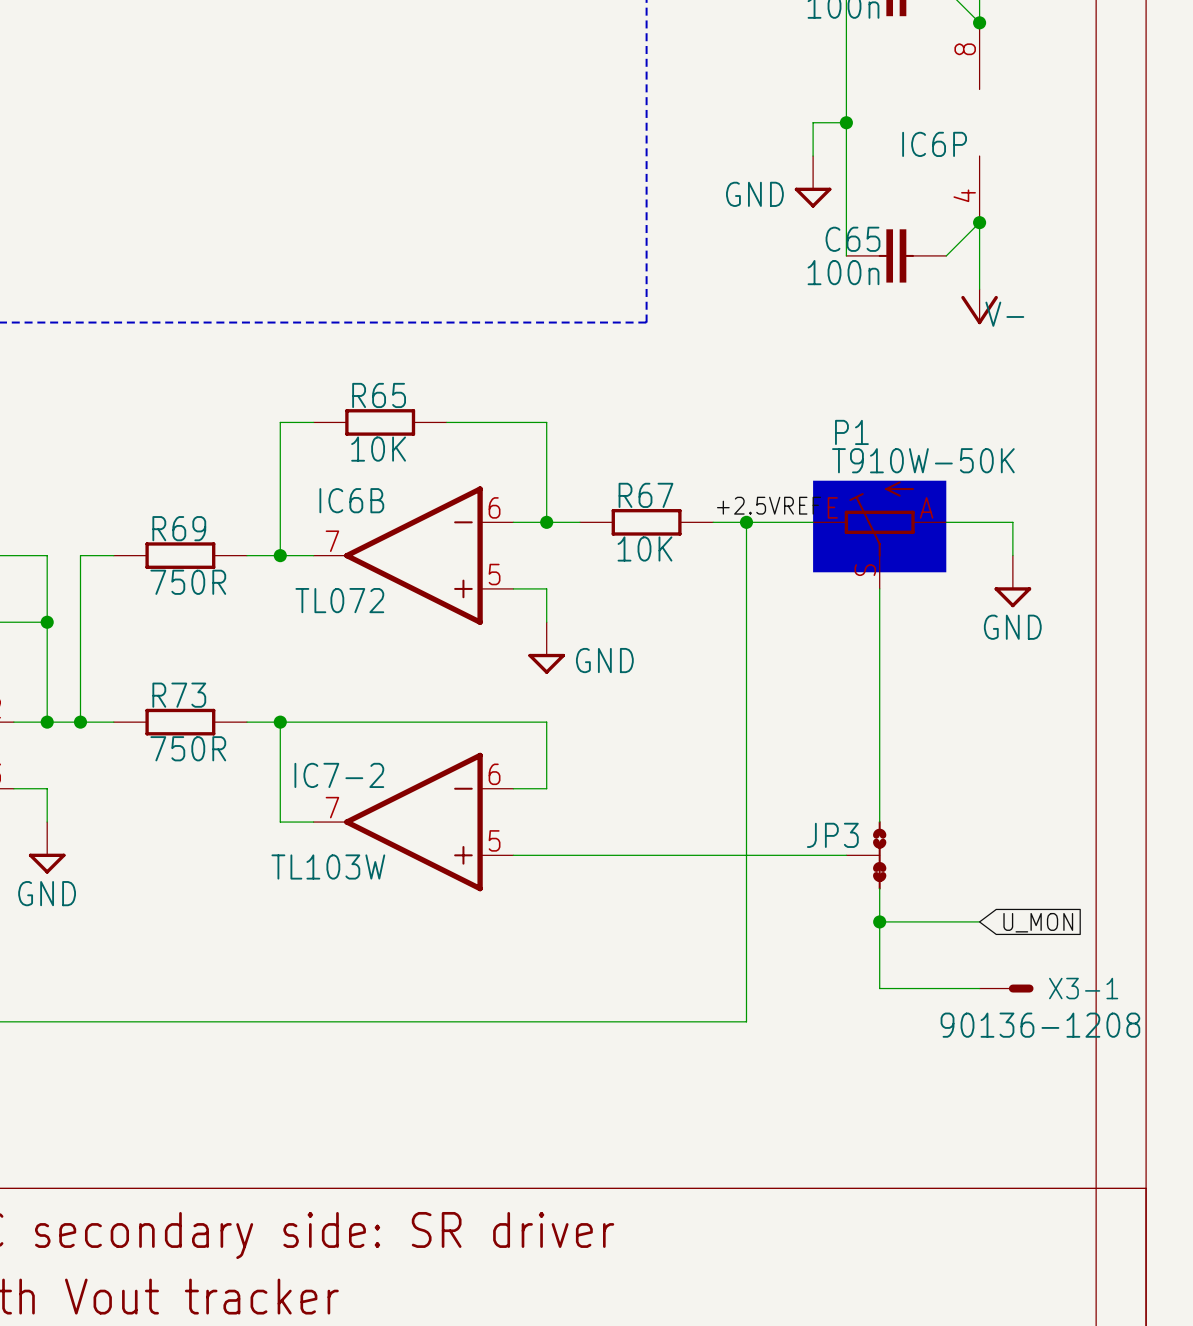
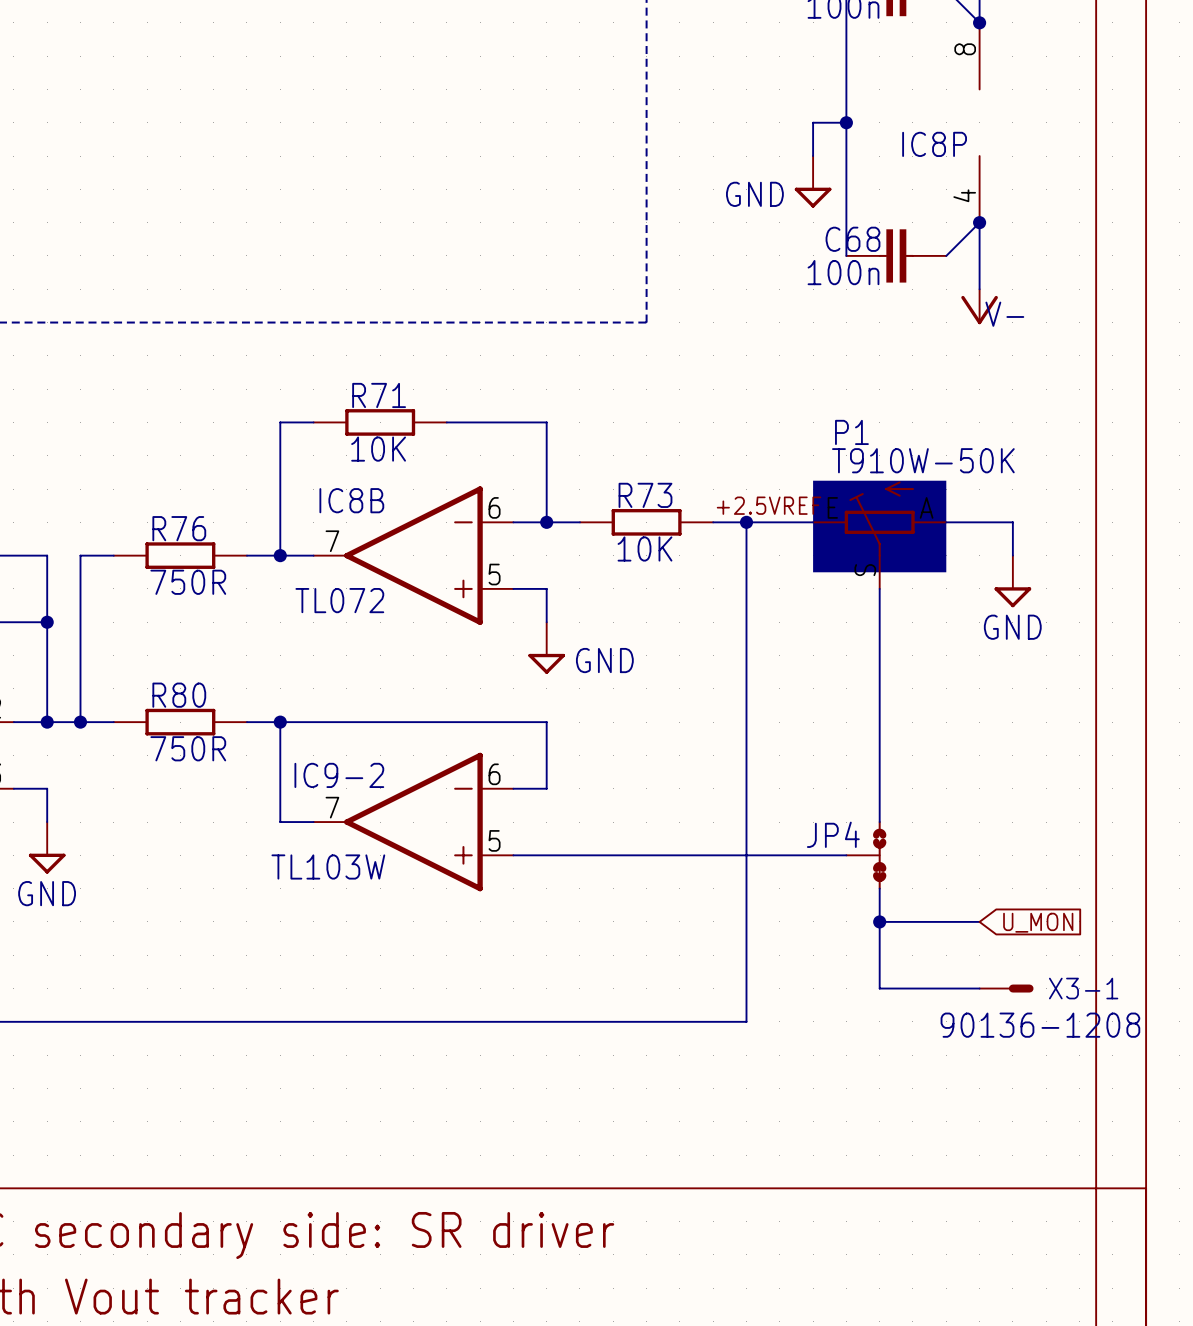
IC6P name: IC6P (934, 144) -> IC8P (934, 144)
C65 name: C65 (852, 239) -> C68 (852, 239)
R65 name: R65 (379, 395) -> R71 (379, 395)
R67 name: R67 (645, 495) -> R73 (645, 495)
IC6B name: IC6B (351, 500) -> IC8B (351, 500)
R69 name: R69 (179, 528) -> R76 (179, 528)
R73 name: R73 (179, 695) -> R80 (179, 695)
IC7-2 name: IC7-2 (339, 775) -> IC9-2 (339, 775)
JP3 name: JP3 (832, 835) -> JP4 (833, 834)

